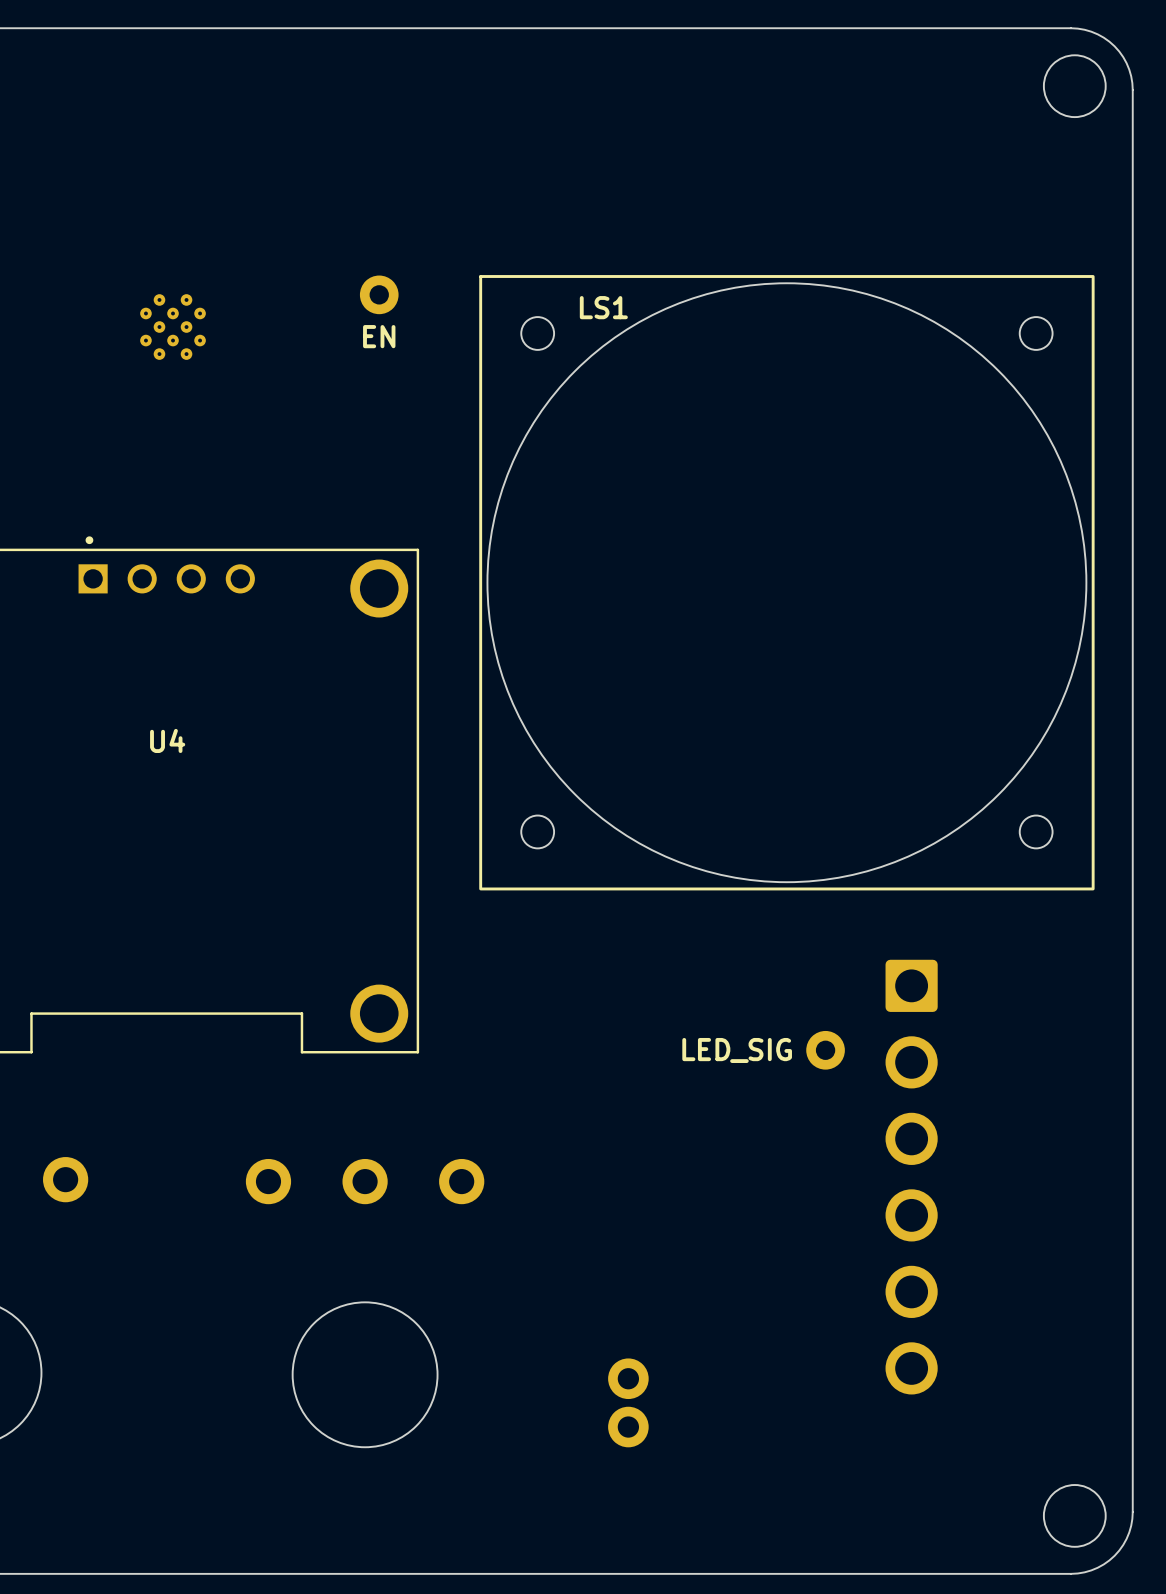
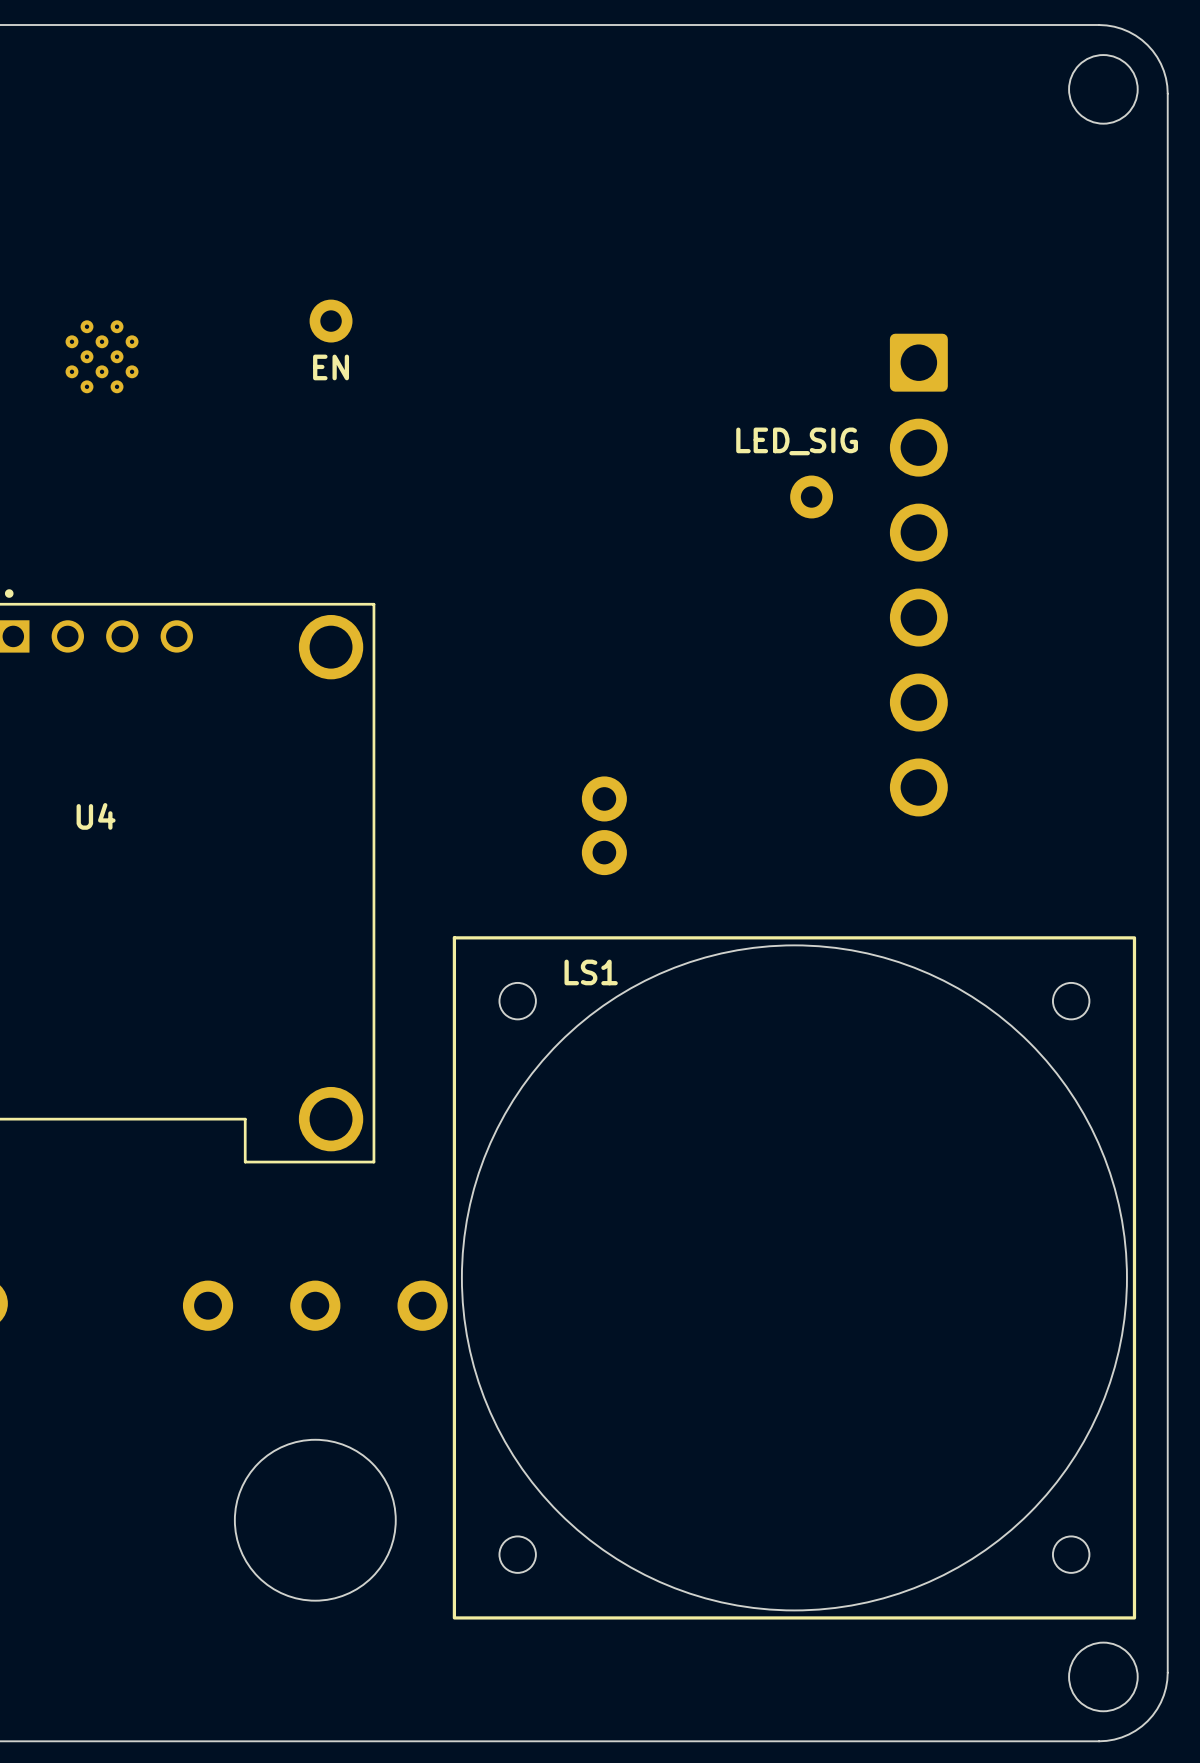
text: none -> LED_SIG (797, 441)
part: none -> (811, 496)
part: none -> (918, 575)
LS1 position: (786, 582) -> (794, 1277)
part: none -> (604, 825)
text: LED_SIG (737, 1050) -> none
part: (825, 1050) -> none
part: (911, 1177) -> none
part: (628, 1402) -> none

